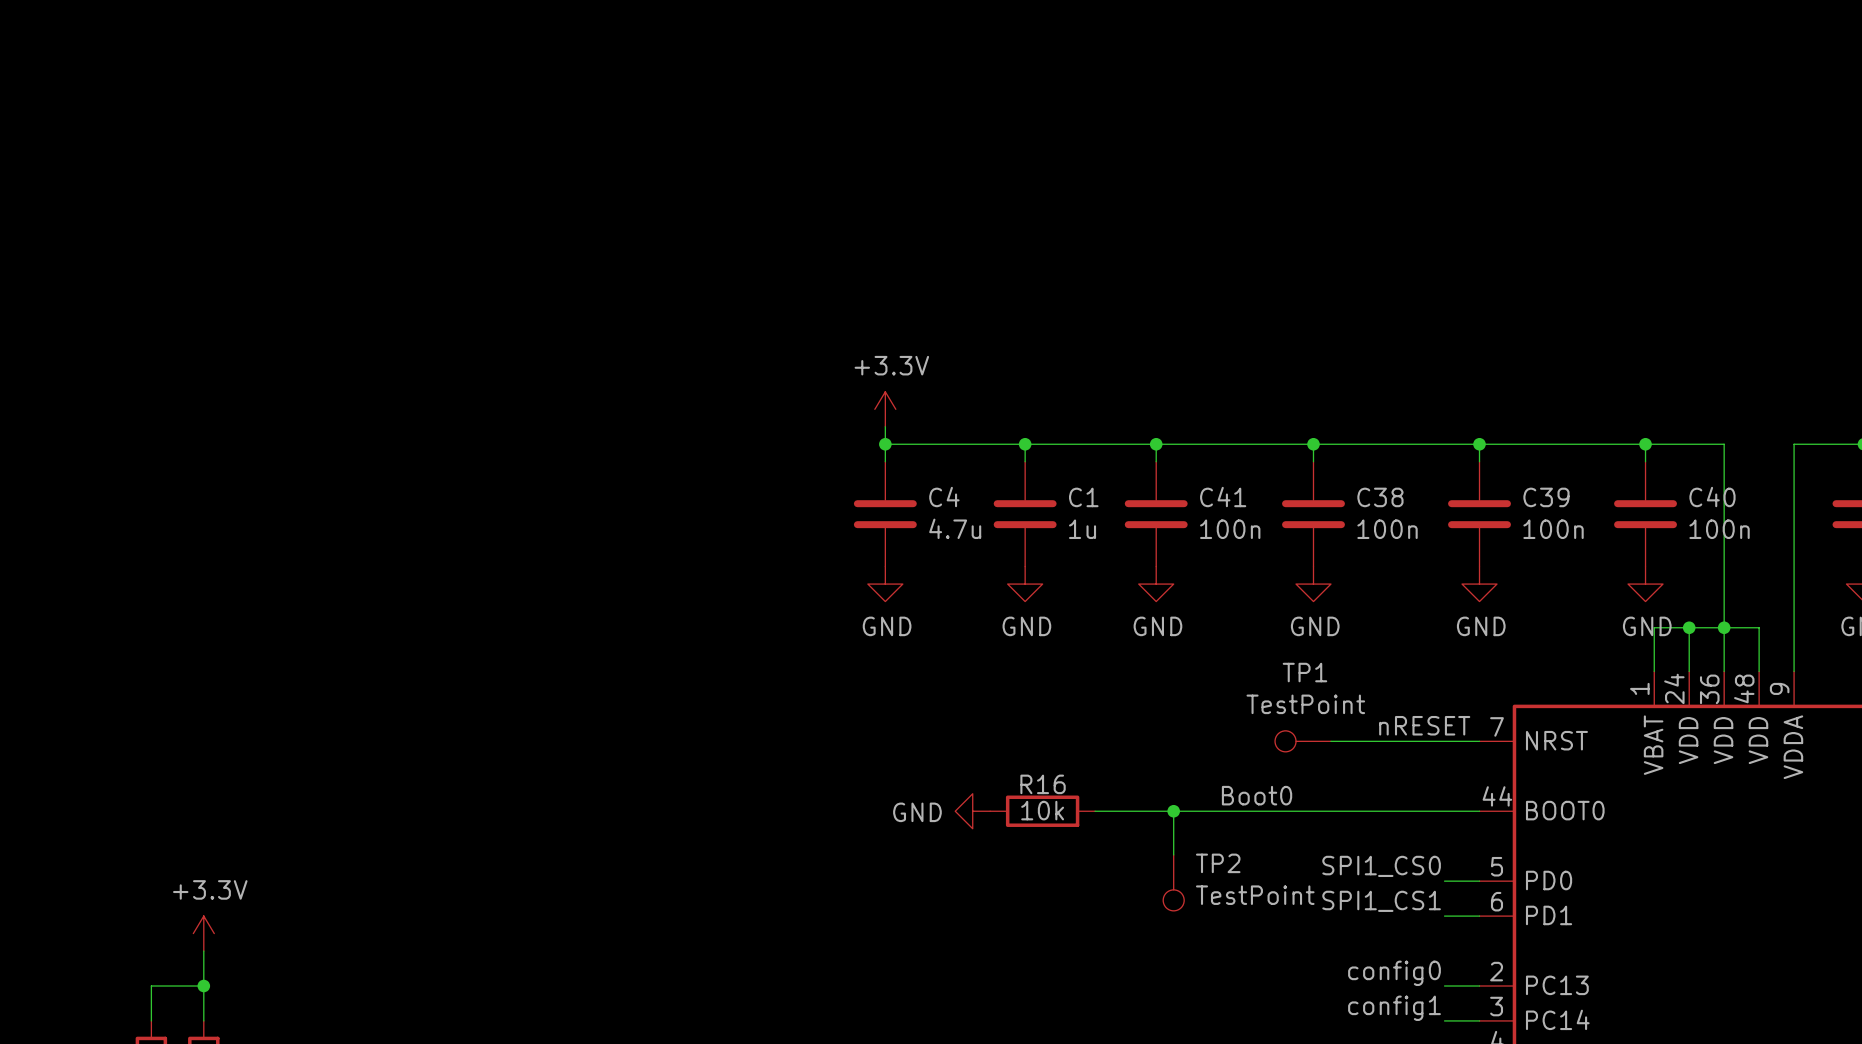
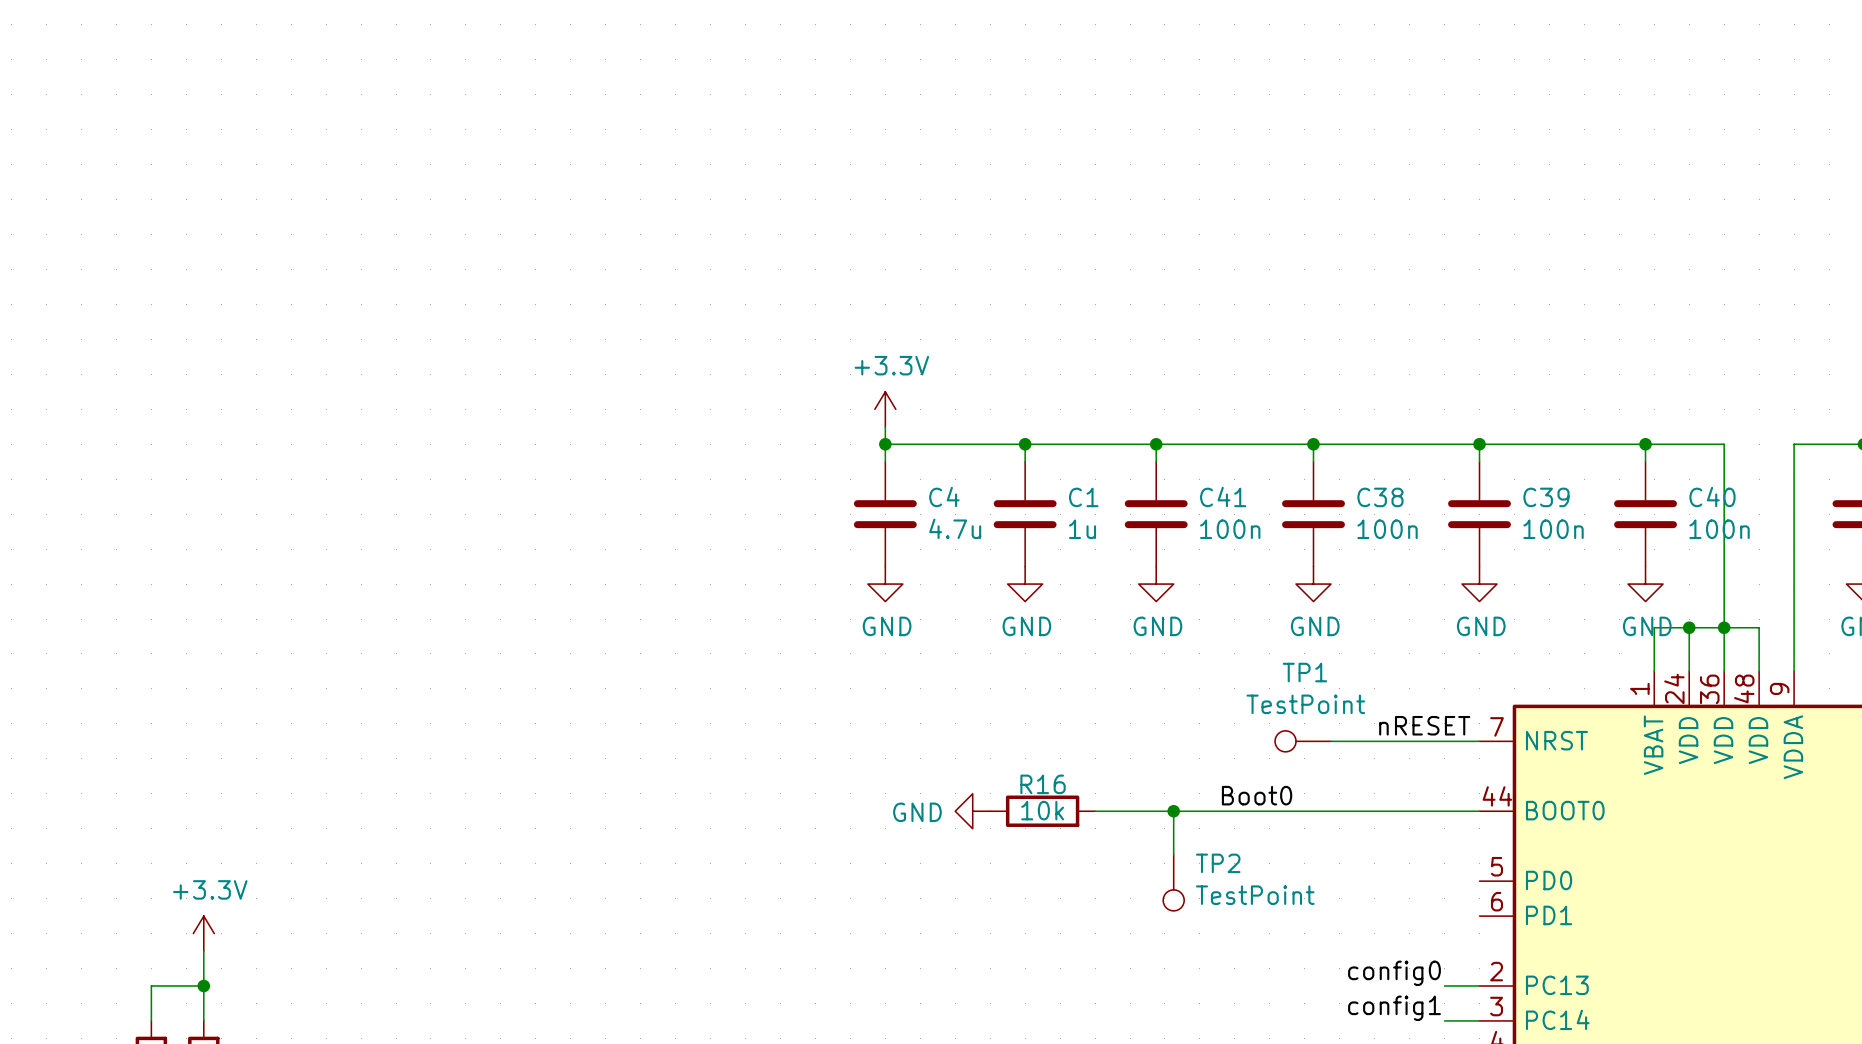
label: SPI1_CS0 (1381, 866) -> none
wire: (1444, 881) (1479, 881) -> none
label: SPI1_CS1 (1381, 901) -> none
wire: (1444, 916) (1479, 916) -> none

